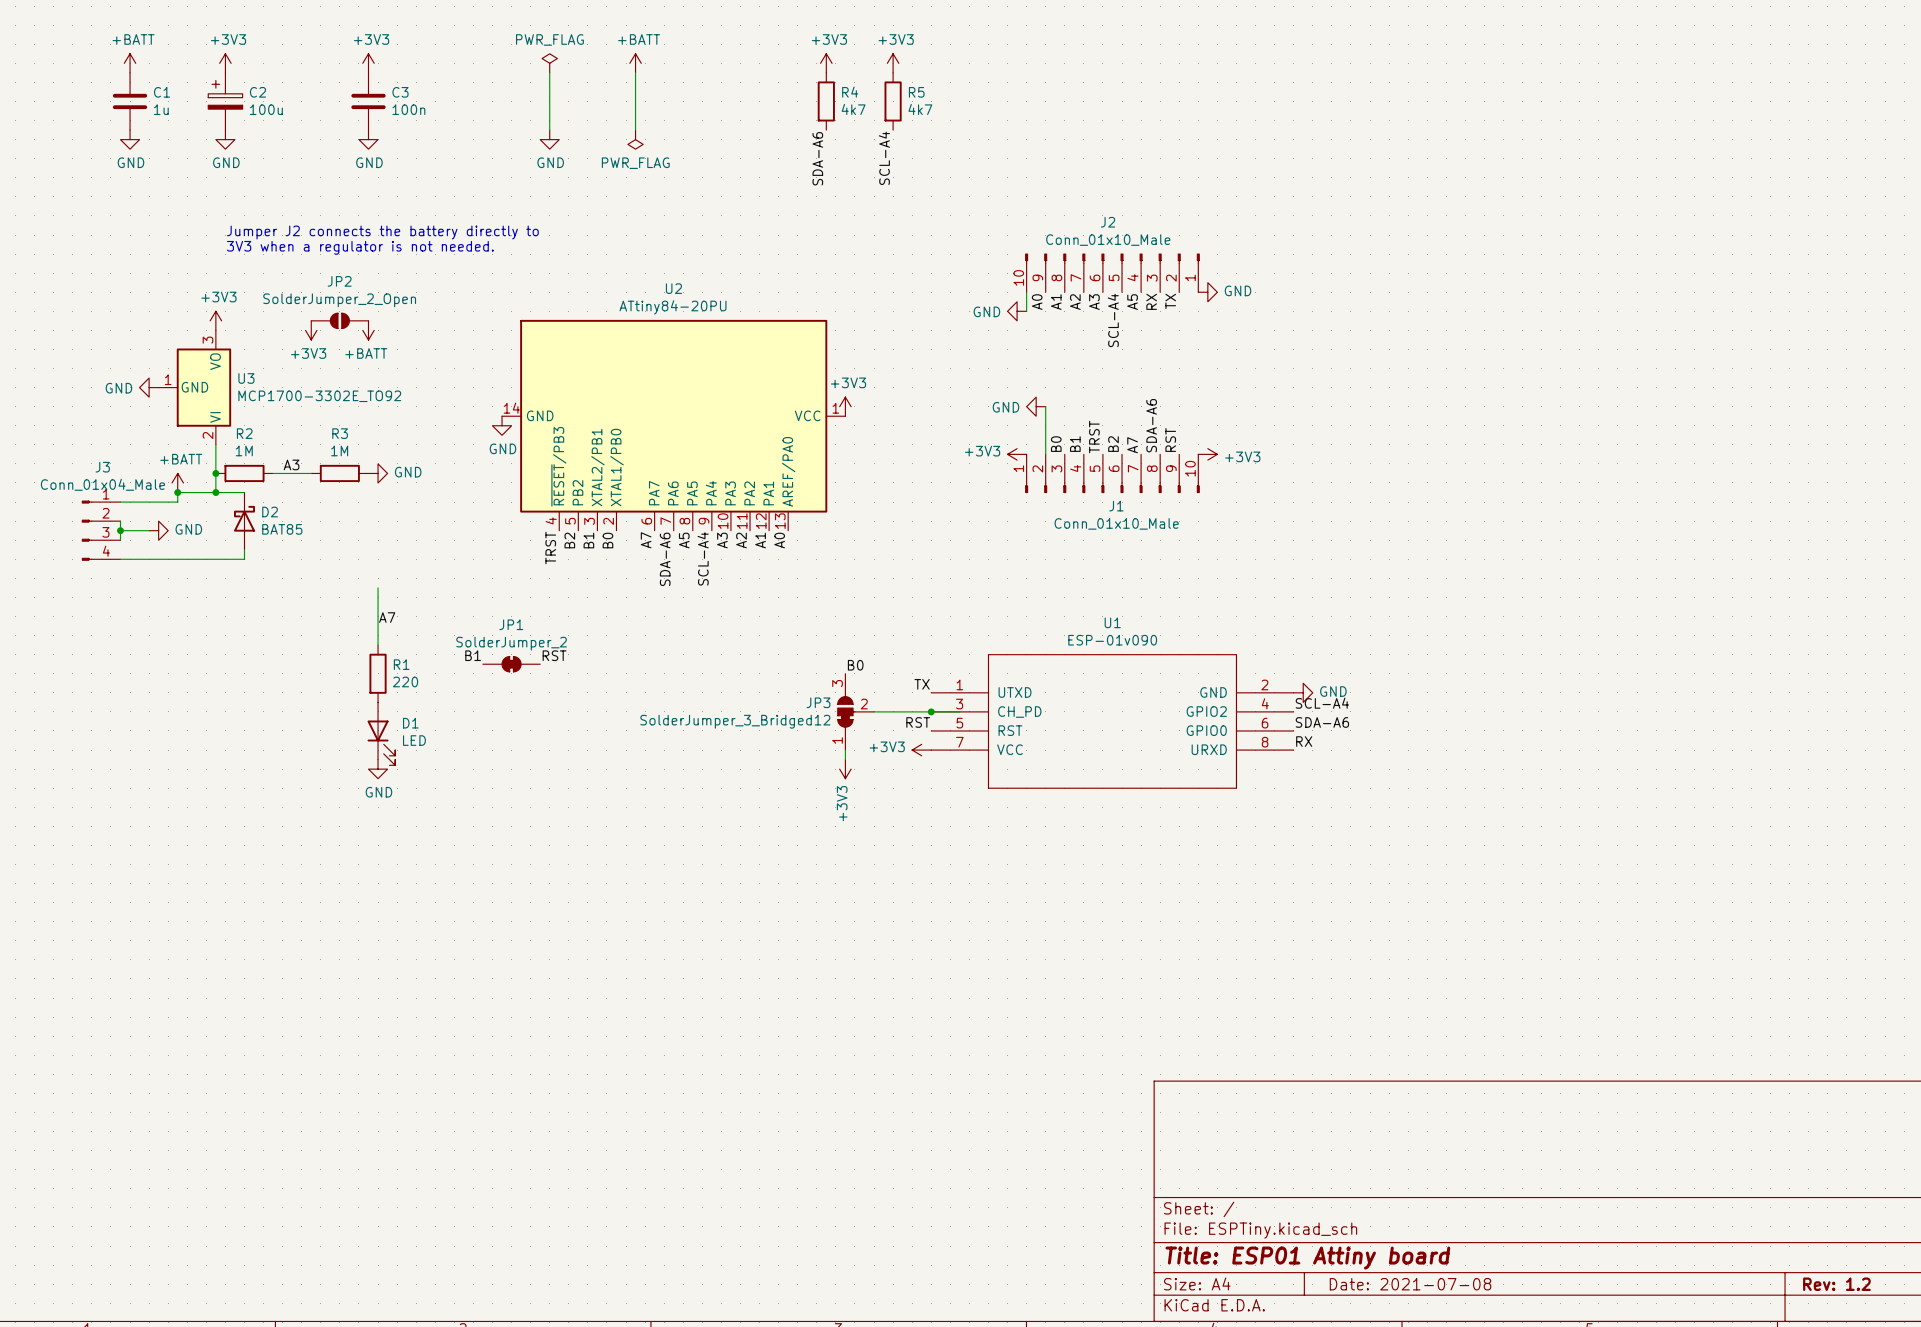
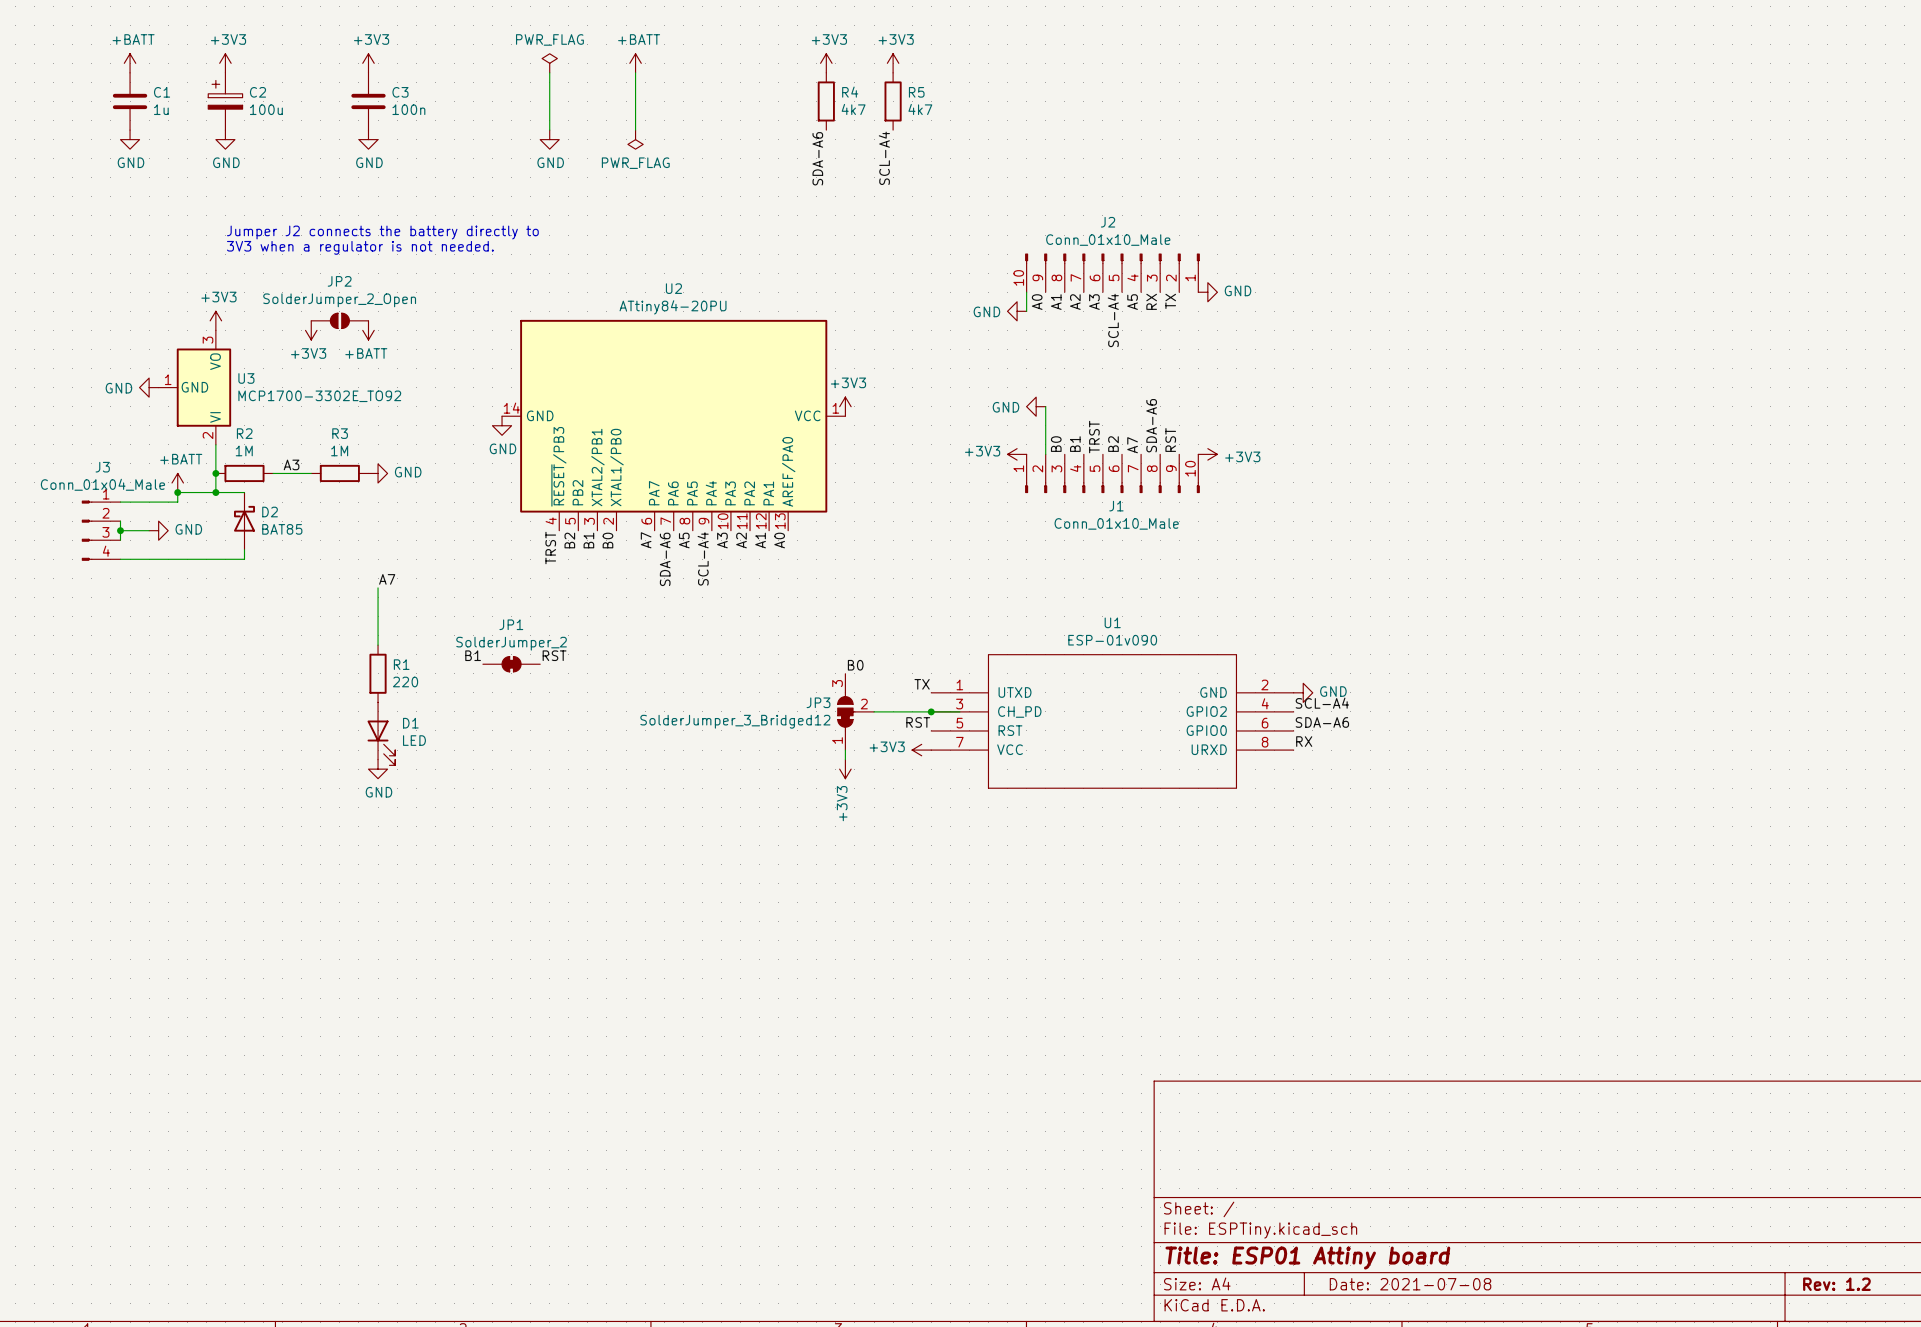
label position: A7 (387, 617) -> A7 (387, 579)

